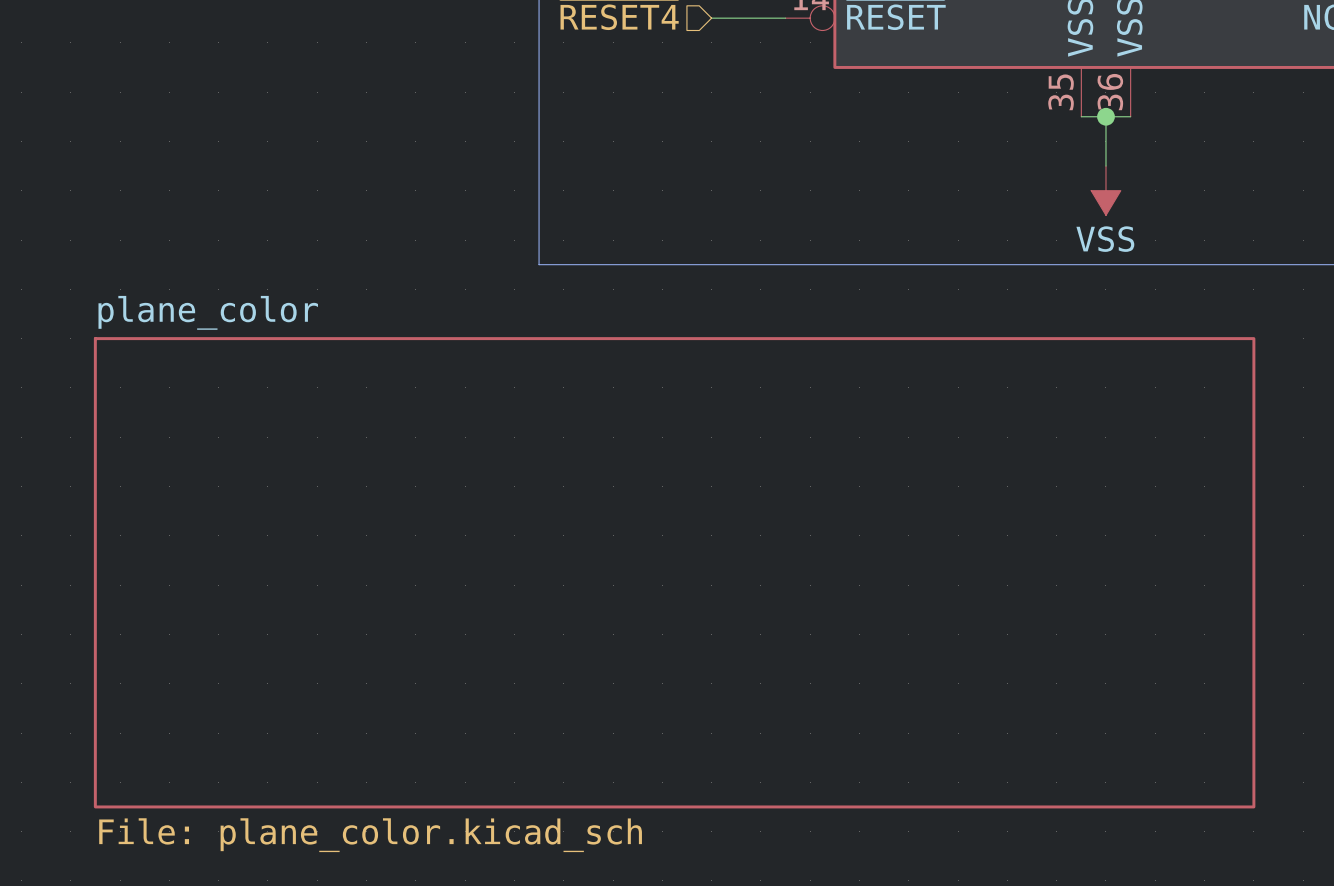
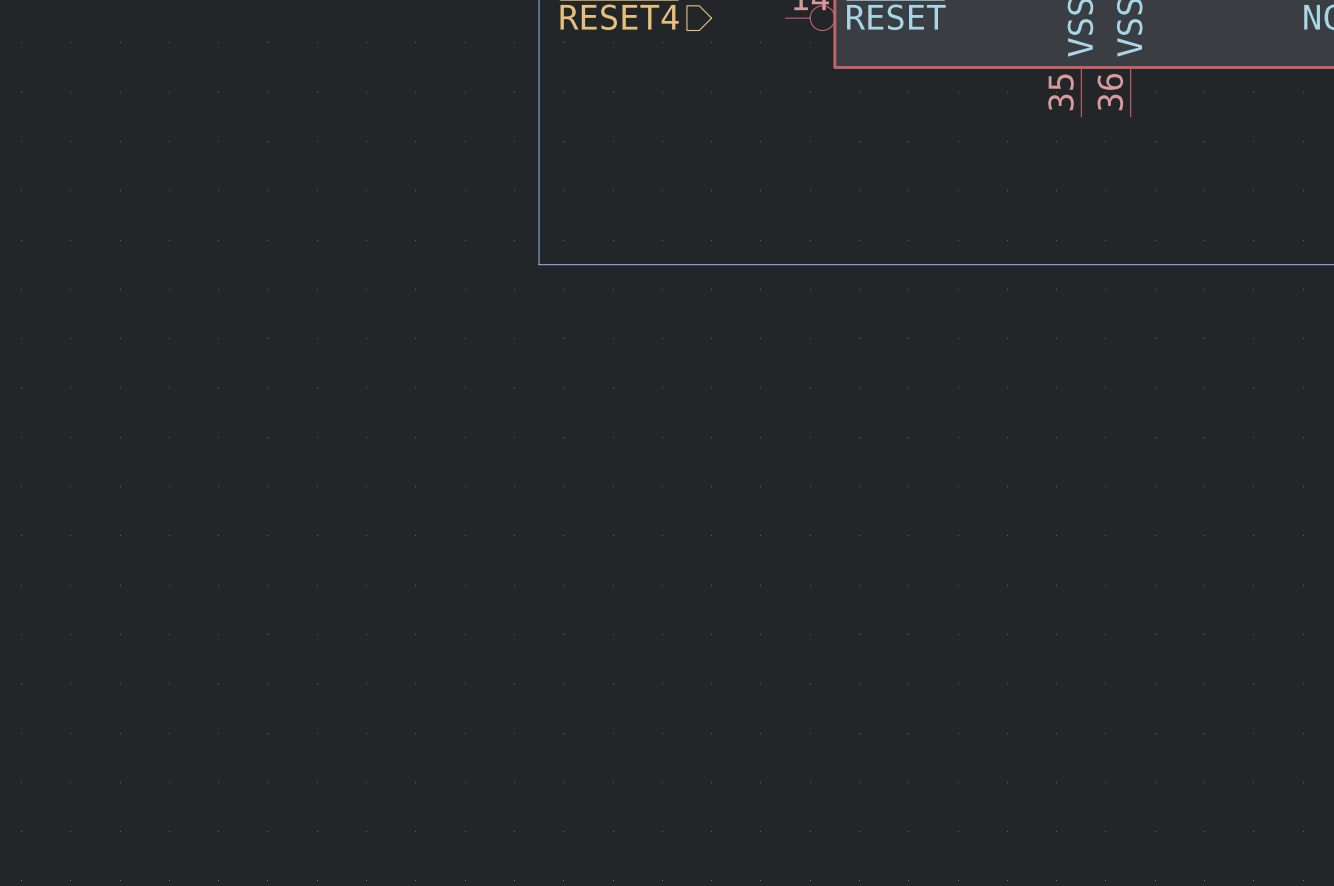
wire: (711, 18) (785, 18) -> none
wire: (1081, 116) (1130, 116) -> none
wire: (1105, 116) (1105, 166) -> none
junction: (1105, 116) -> none
power symbol: VSS (1105, 190) -> none
sheet plane_color: File: plane_color.kicad_sch (674, 572) -> none

